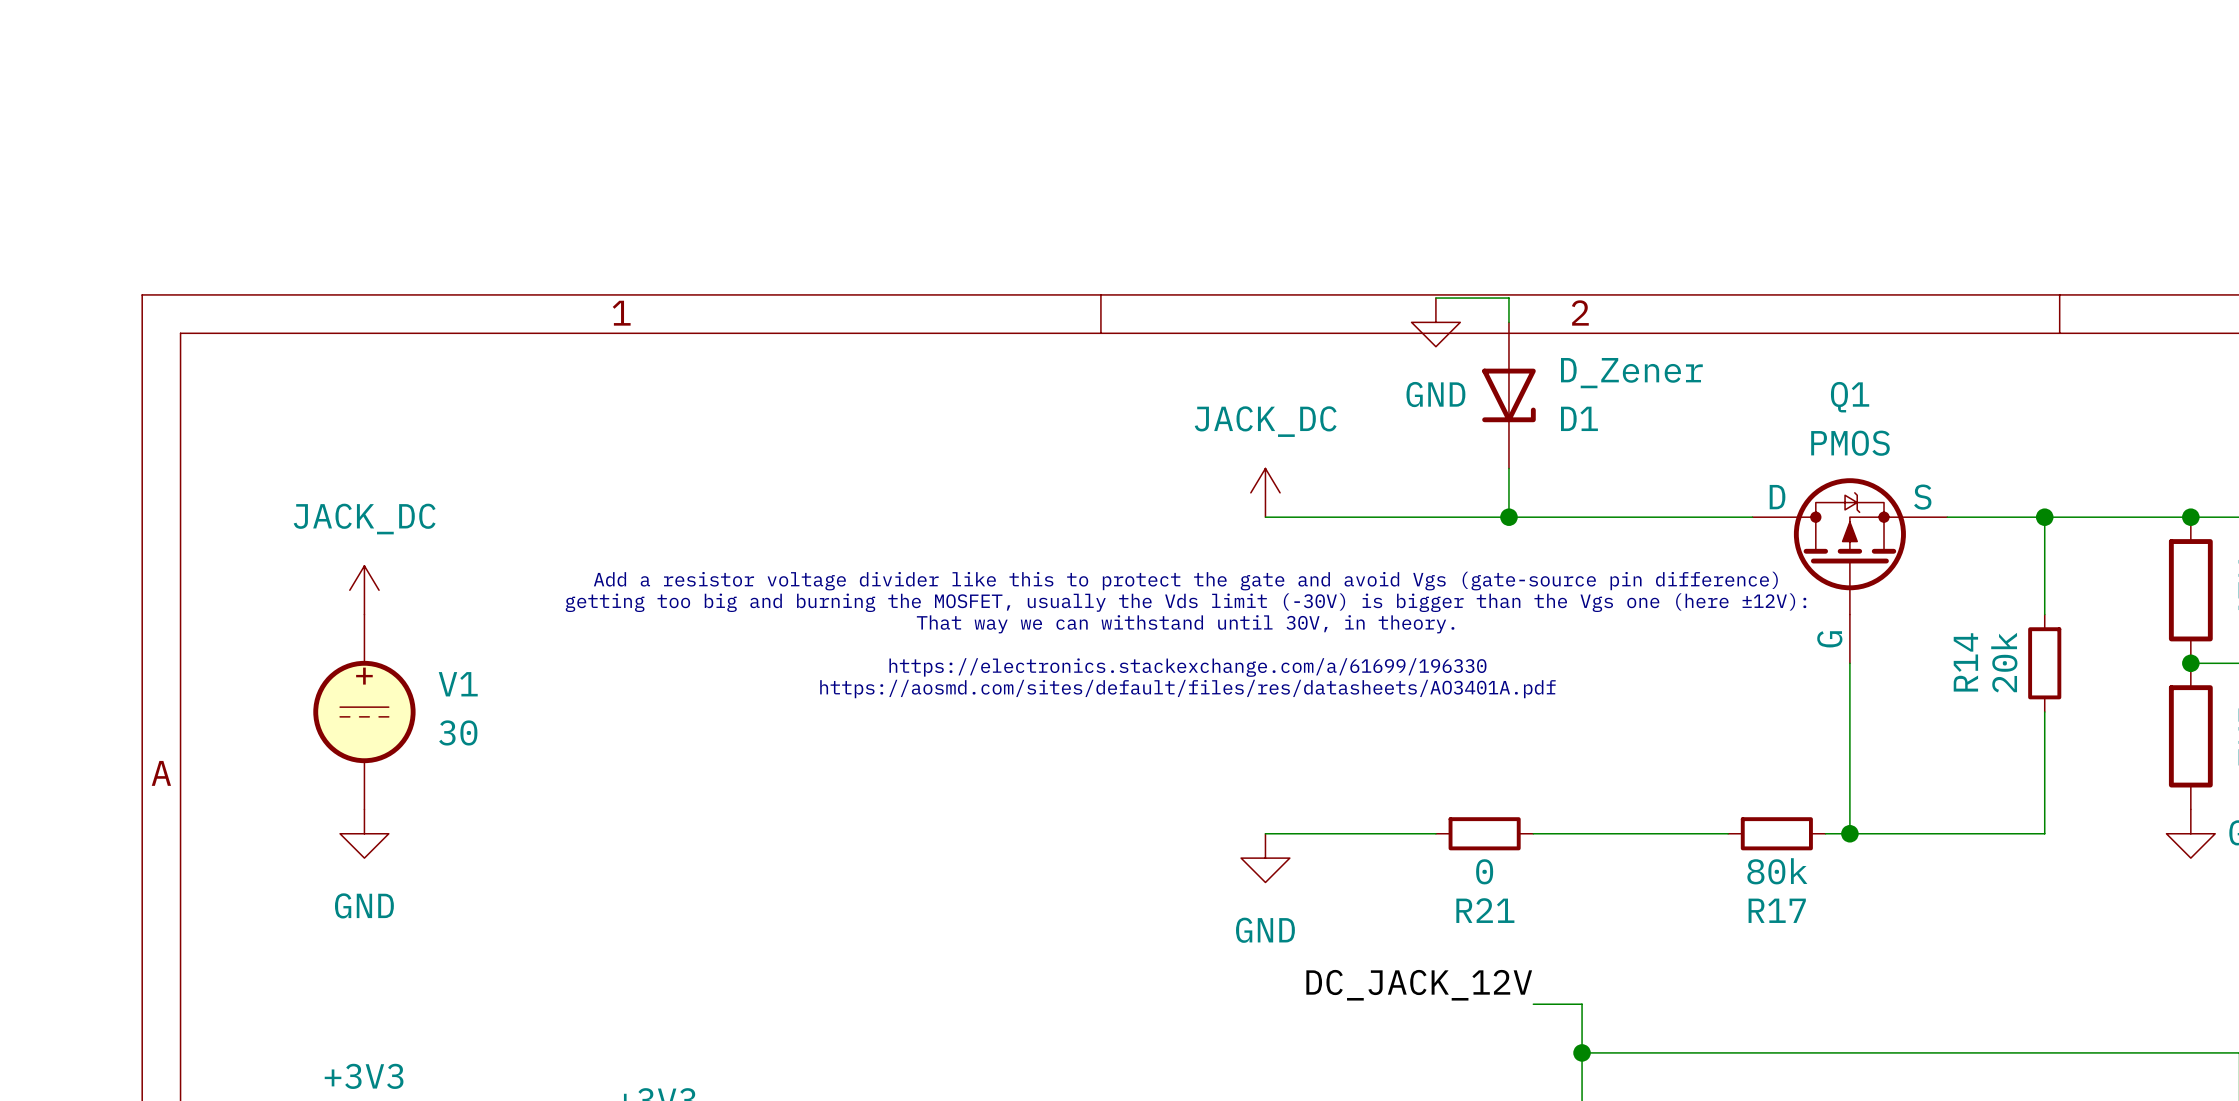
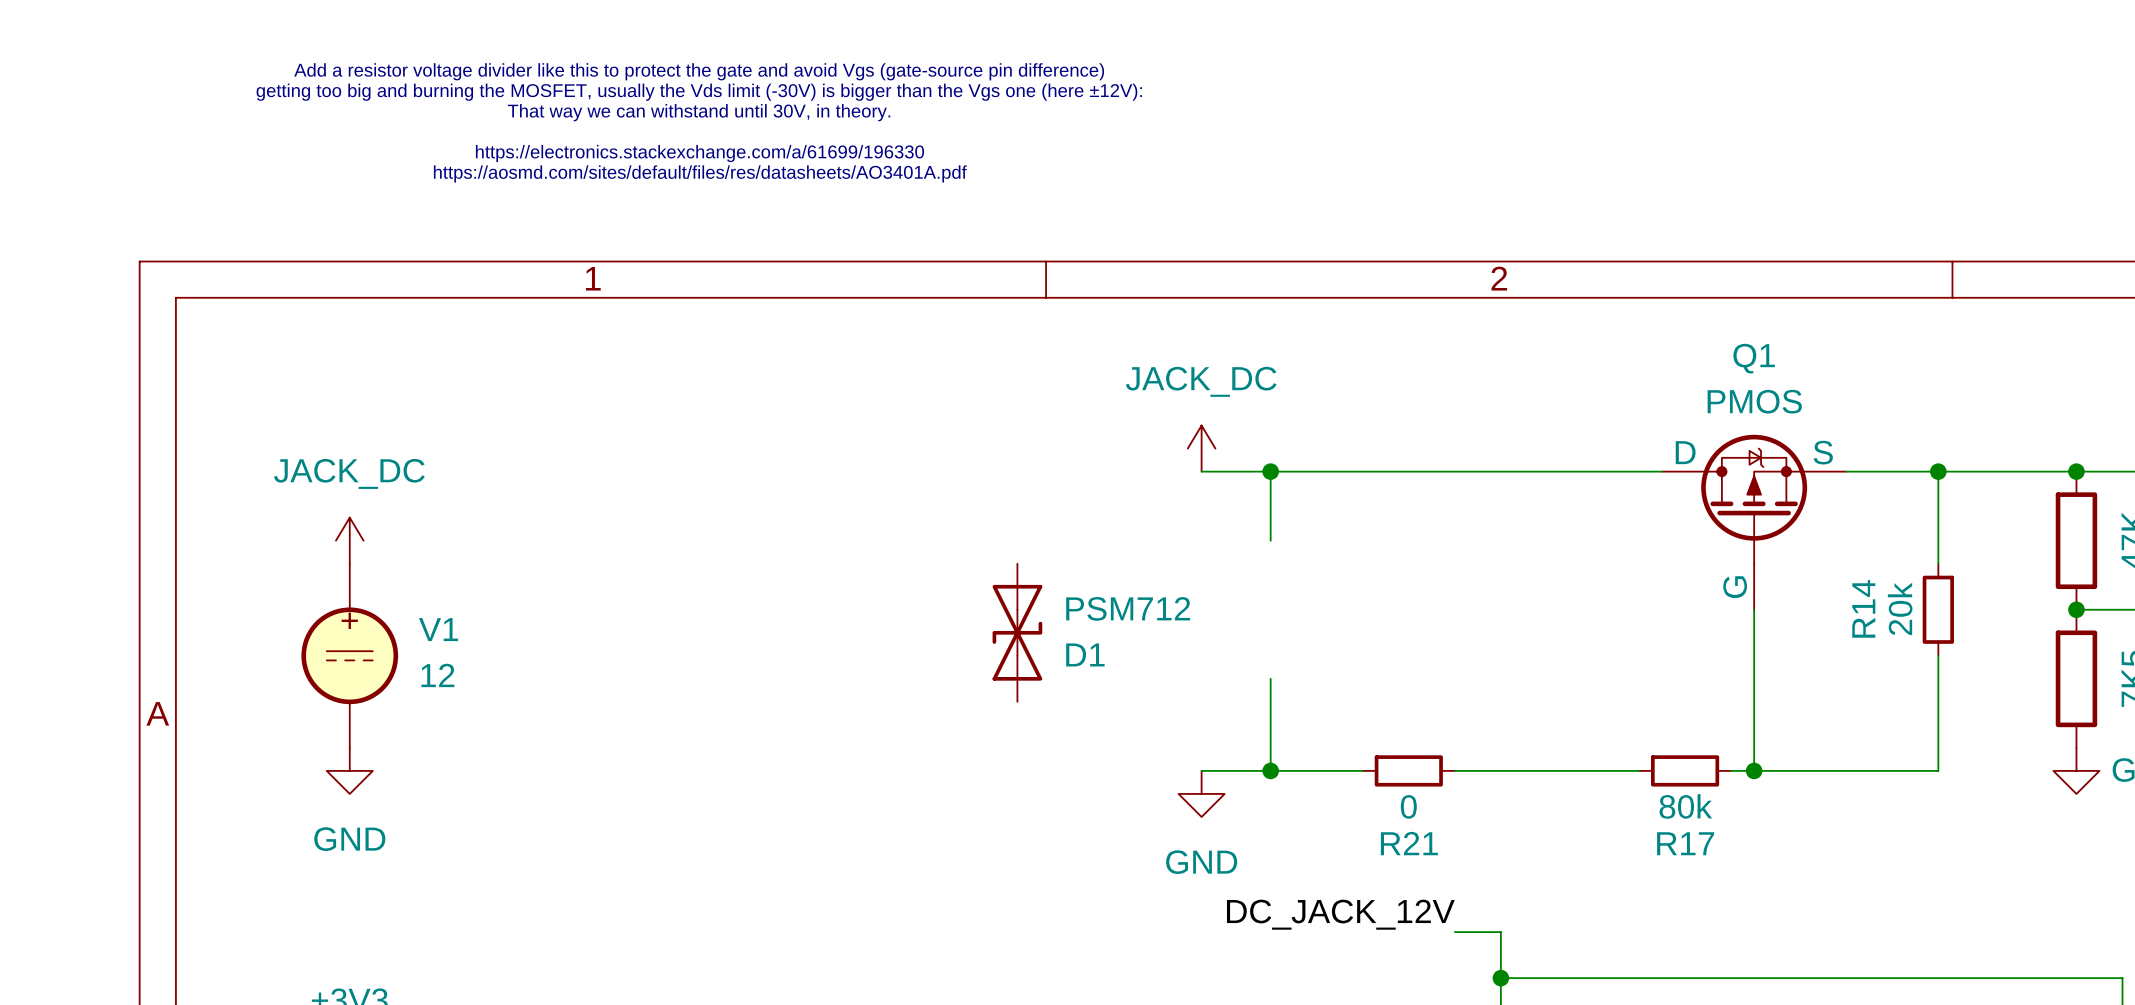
text: none -> Add a resistor voltage divider like this to protect the gate and avoid Vgs (gate-source pin difference) (699, 71)
text: none -> getting too big and burning the MOSFET, usually the Vds limit (-30V) is bigger than the Vgs one (here ±12V): (699, 92)
text: none -> That way we can withstand until 30V, in theory. (699, 112)
text: none -> https://electronics.stackexchange.com/a/61699/196330 (699, 153)
text: none -> https://aosmd.com/sites/default/files/res/datasheets/AO3401A.pdf (700, 173)
wire: (1435, 298) (1508, 298) (1508, 322) -> none
power symbol: GND (1435, 322) -> none
D1 symbol: [1482, 322, 1536, 469] -> [992, 563, 1043, 702]
D1 value: D_Zener (1631, 373) -> PSM712 (1128, 608)
wire: (1508, 468) (1508, 517) -> none
wire: none -> (1270, 471) (1270, 540)
junction: none -> (1270, 471)
junction: (1508, 517) -> none
text: Add a resistor voltage divider like this to protect the gate and avoid Vgs (gate-source pin difference) (1185, 581) -> none
text: getting too big and burning the MOSFET, usually the Vds limit (-30V) is bigger than the Vgs one (here ±12V): (1186, 602) -> none
text: That way we can withstand until 30V, in theory. (1185, 624) -> none
text: https://electronics.stackexchange.com/a/61699/196330 (1187, 667) -> none
text: https://aosmd.com/sites/default/files/res/datasheets/AO3401A.pdf (1187, 689) -> none
V1 value: 30 (458, 732) -> 12 (437, 675)
wire: none -> (1270, 678) (1270, 770)
junction: none -> (1270, 770)

